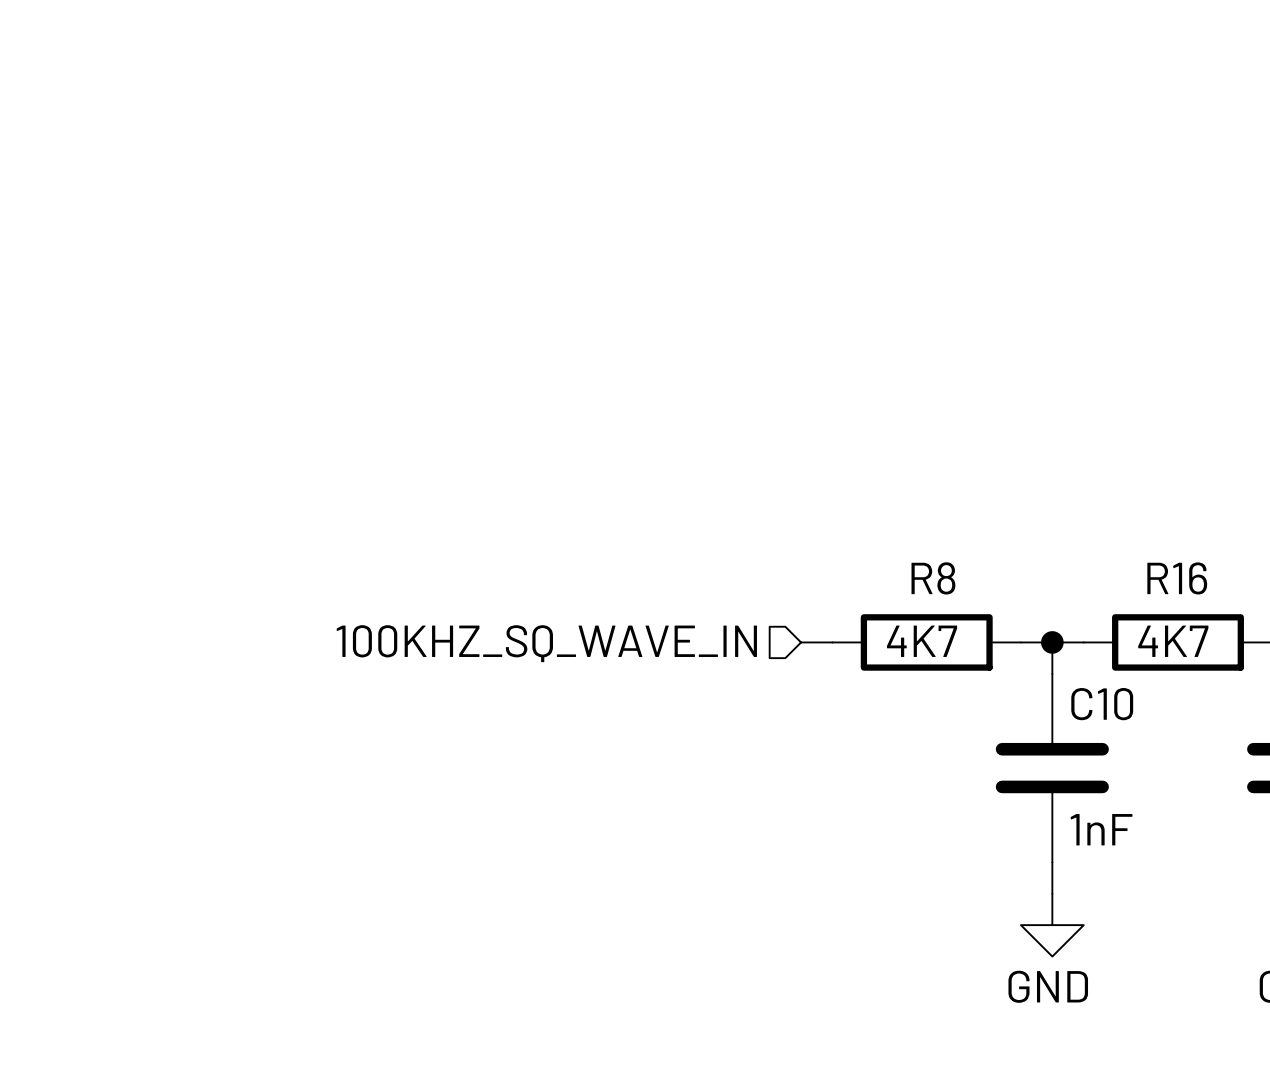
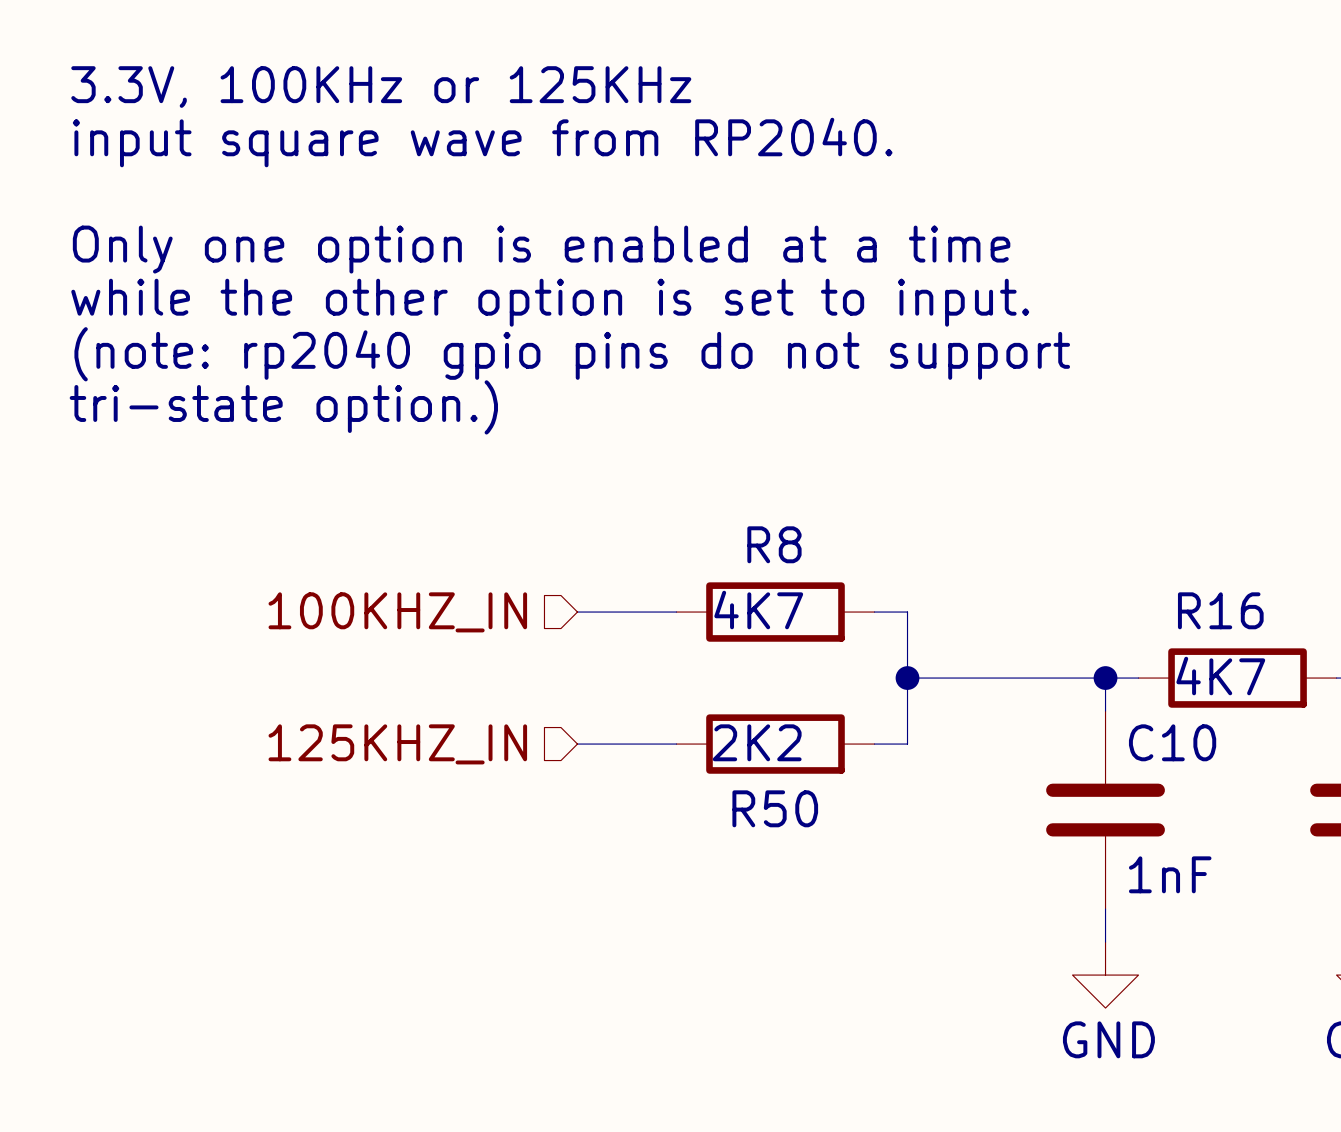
text: none -> 3.3V, 100KHz or 125KHz (381, 87)
text: none -> input square wave from RP2040. (482, 142)
text: none -> Only one option is enabled at a time (541, 249)
text: none -> while the other option is set to input. (550, 302)
text: none -> (note: rp2040 gpio pins do not support (572, 354)
text: none -> tri-state option.) (283, 407)
wire: none -> (577, 612) (676, 612)
wire: none -> (874, 612) (907, 612) (907, 744) (874, 744)
wire: (801, 642) (832, 642) -> none
wire: none -> (907, 678) (1072, 678)
junction: none -> (907, 678)
R8 position: (926, 642) -> (775, 612)
hierarchical label: 100KHZ_SQ_WAVE_IN (546, 643) -> 100KHZ_IN (397, 612)
hierarchical label: none -> 125KHZ_IN (397, 744)
wire: none -> (577, 744) (676, 744)
R50: none -> 2K2 (775, 744)

